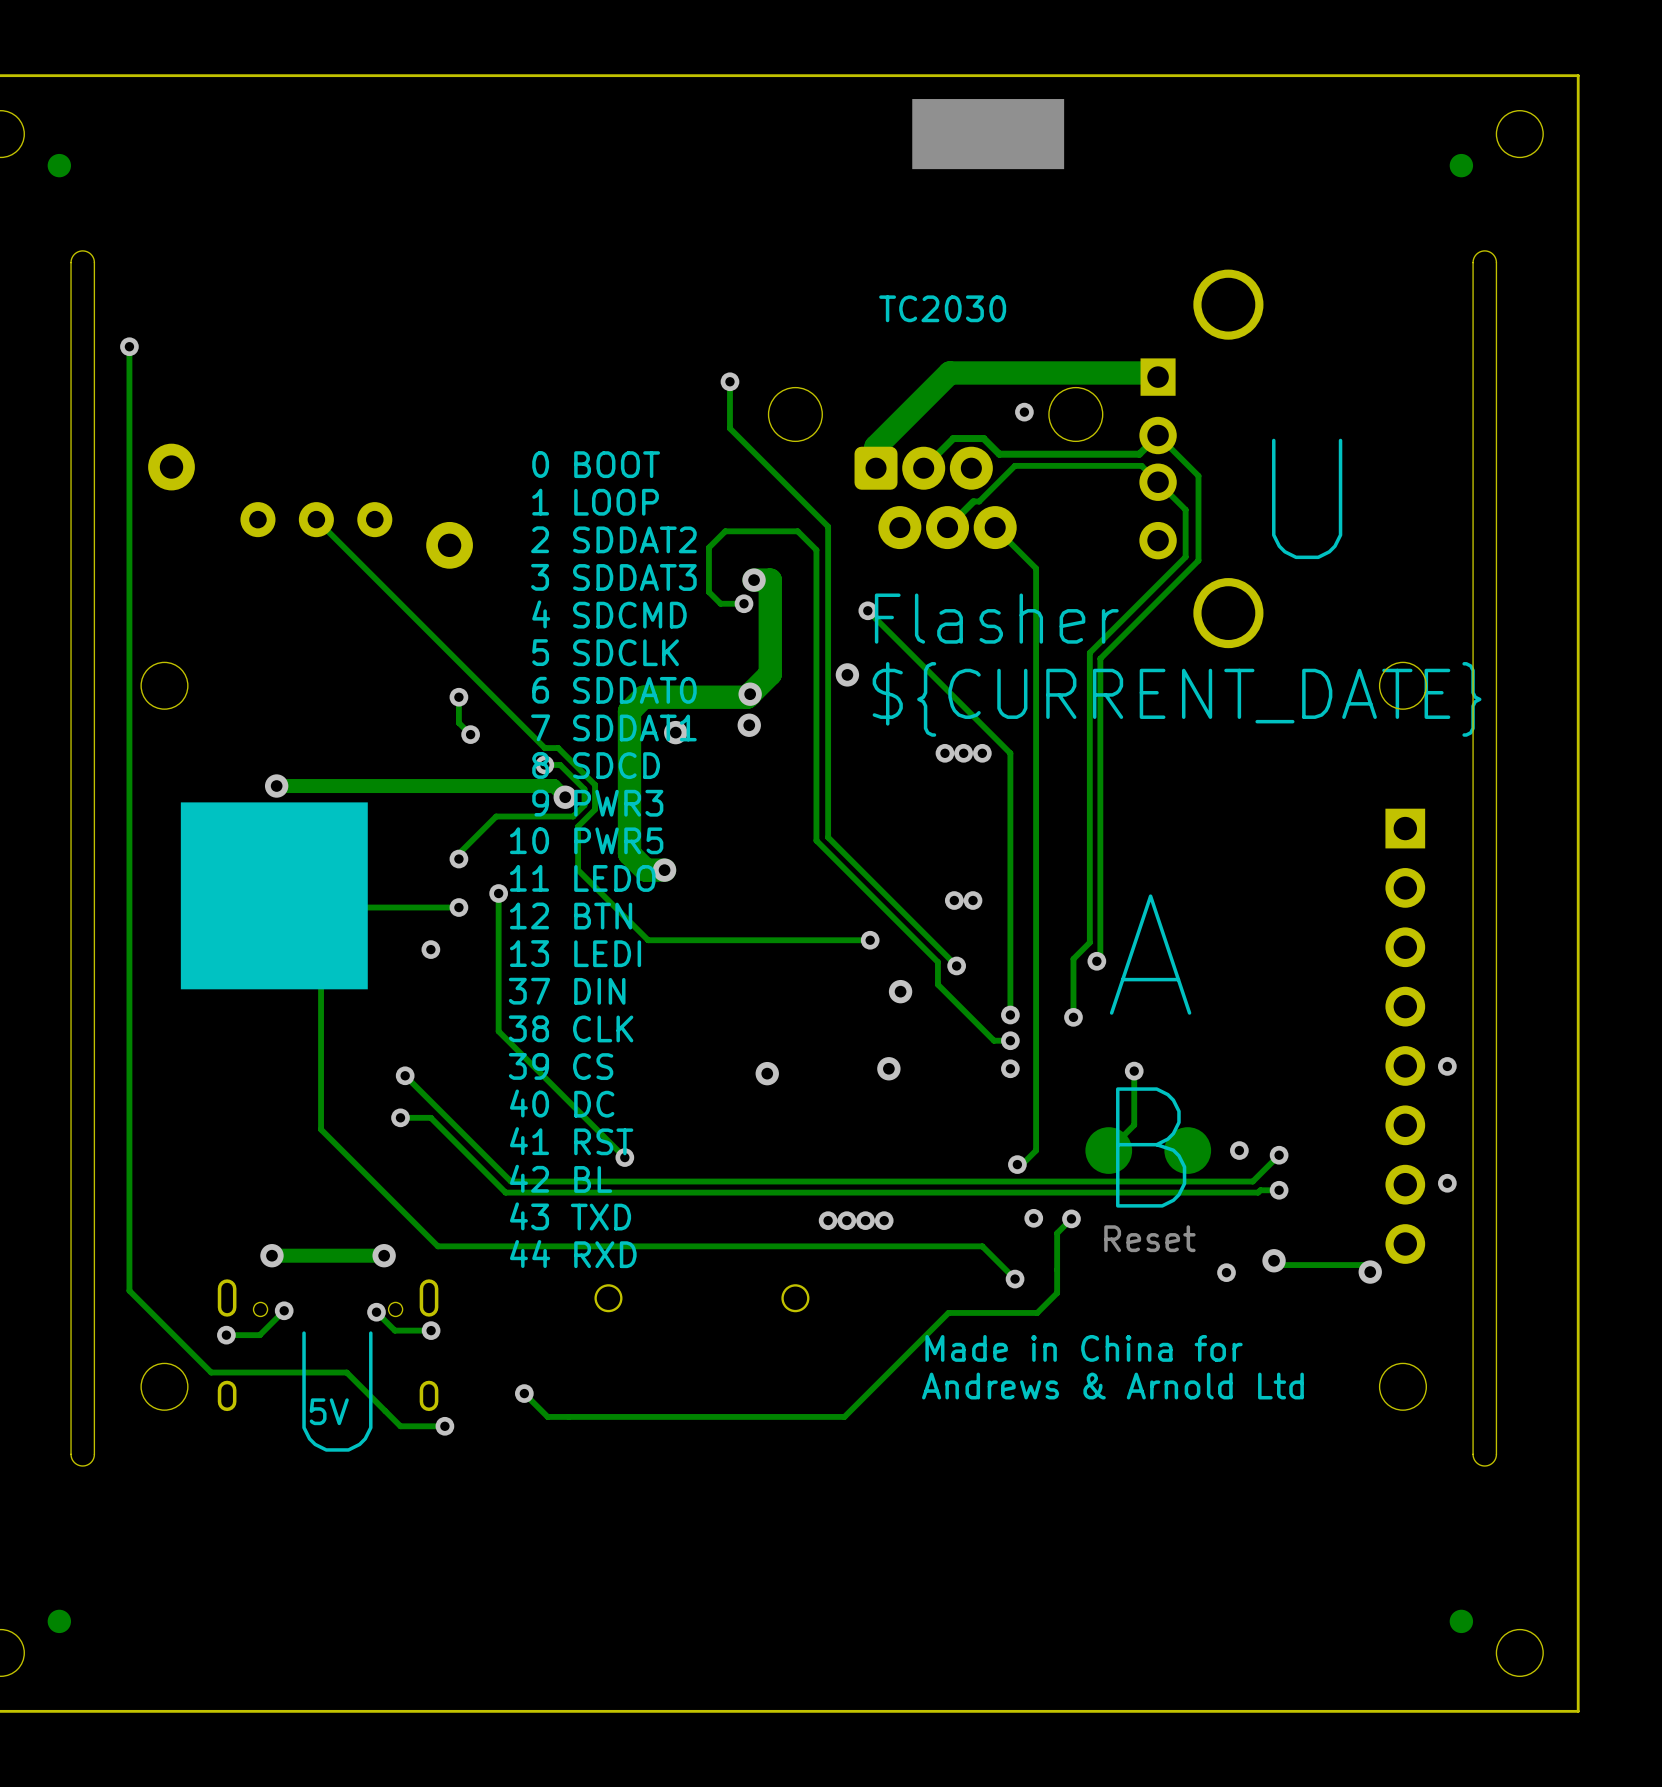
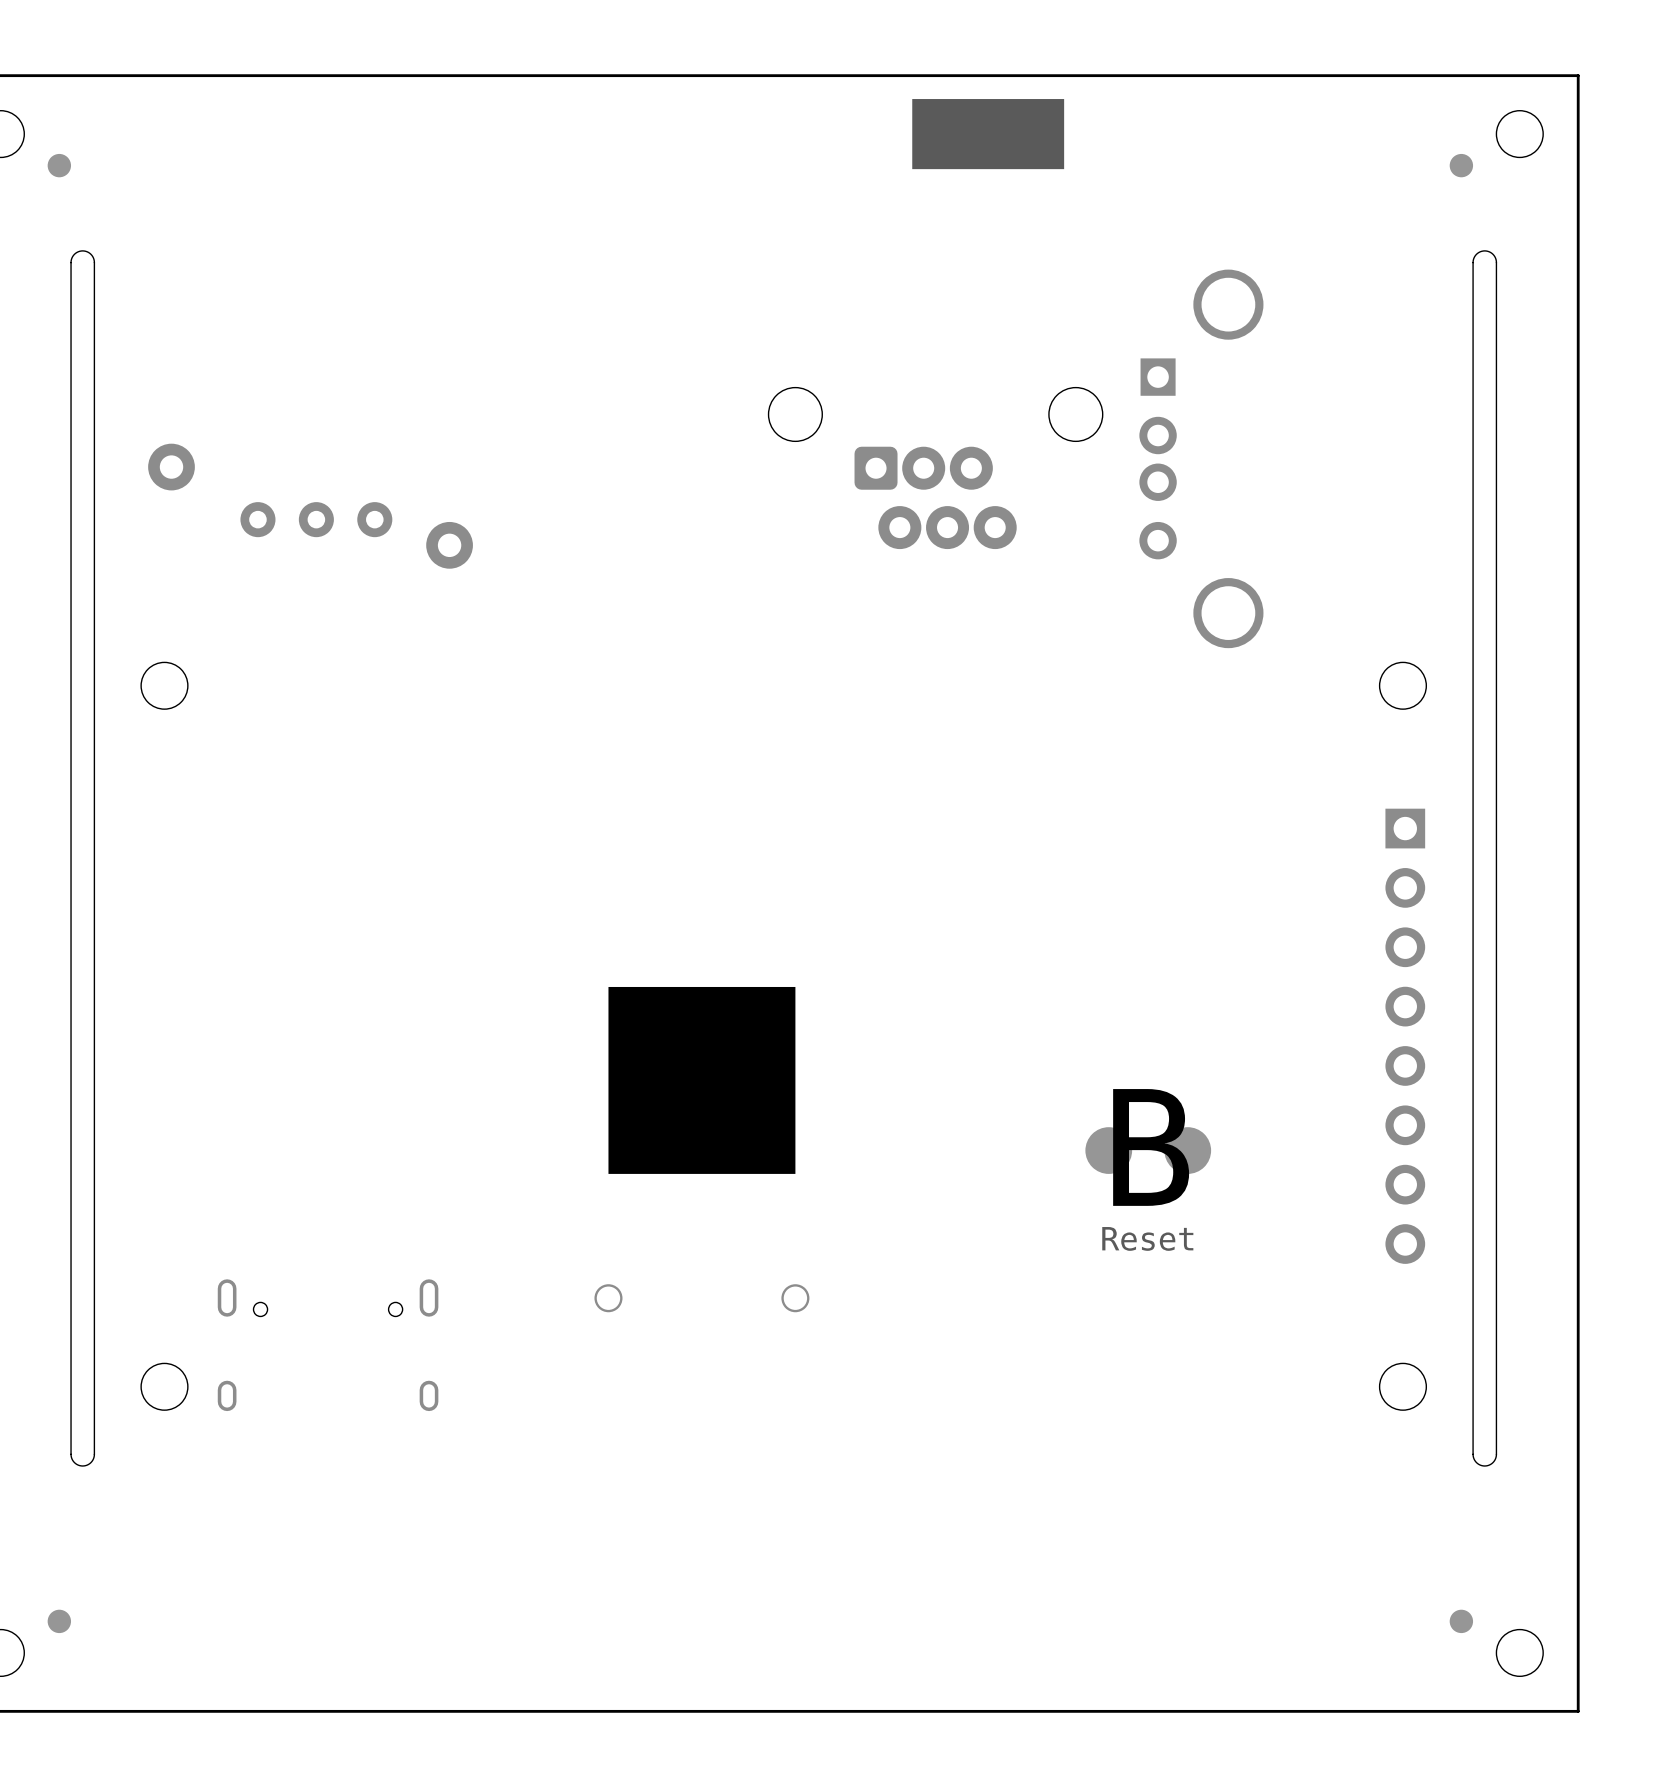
text: TC2030 (942, 308) -> none
track: (129, 346) (129, 1290) (211, 1372) (346, 1372) (400, 1426) (444, 1426) -> none
via: (129, 346) -> none
track: (1153, 372) (949, 372) (876, 446) (876, 468) -> none
track: (729, 381) (729, 428) (828, 526) (828, 837) (956, 965) -> none
via: (729, 381) -> none
via: (1024, 412) -> none
text: 0 (540, 464) -> none
text: BOOT (617, 464) -> none
track: (923, 468) (953, 438) (983, 438) (999, 454) (1139, 454) (1158, 435) (1198, 475) (1198, 560) (1100, 658) (1100, 957) (1096, 961) -> none
text: U (1307, 498) -> none
text: 1 (540, 502) -> none
text: LOOP (616, 502) -> none
track: (316, 519) (544, 748) (558, 748) (595, 784) (595, 809) (578, 826) (578, 870) (648, 940) (870, 940) -> none
track: (947, 527) (973, 501) (979, 501) (1014, 465) (1141, 465) (1185, 509) (1185, 557) (1089, 652) (1089, 942) (1073, 958) (1073, 1017) -> none
track: (995, 527) (1036, 568) (1036, 1150) (1022, 1164) (1017, 1164) -> none
text: 2 (540, 539) -> none
text: SDDAT2 (634, 539) -> none
text: 3 (540, 577) -> none
text: SDDAT3 (634, 577) -> none
track: (754, 580) (770, 580) (770, 674) (747, 697) (643, 697) (629, 711) (629, 853) (645, 870) (664, 870) -> none
via: (754, 580) -> none
track: (744, 603) (720, 603) (708, 592) (708, 547) (725, 531) (797, 531) (816, 550) (816, 840) (937, 962) (937, 984) (994, 1040) (1010, 1040) -> none
via: (744, 603) -> none
track: (867, 610) (1010, 753) (1010, 1015) -> none
via: (867, 610) -> none
text: 4 (541, 614) -> none
text: SDCMD (629, 615) -> none
text: Flasher (996, 618) -> none
text: 5 (540, 652) -> none
text: SDCLK (625, 652) -> none
via: (847, 674) -> none
text: 6 (540, 690) -> none
text: SDDAT0 (634, 690) -> none
via: (750, 694) -> none
track: (458, 697) (458, 722) (470, 734) -> none
via: (458, 697) -> none
text: ${CURRENT_DATE} (1177, 699) -> none
via: (749, 725) -> none
text: 7 (540, 727) -> none
text: SDDAT1 (634, 727) -> none
via: (675, 732) -> none
via: (470, 734) -> none
via: (944, 753) -> none
via: (963, 753) -> none
via: (982, 753) -> none
track: (544, 764) (560, 764) (584, 789) (584, 805) (573, 816) (496, 816) (458, 853) (458, 859) -> none
via: (544, 764) -> none
text: 8 (540, 765) -> none
text: SDCD (616, 765) -> none
track: (276, 786) (554, 786) (565, 797) -> none
via: (276, 786) -> none
via: (565, 797) -> none
text: 9 (540, 803) -> none
text: PWR3 (618, 803) -> none
text: 10 (529, 840) -> none
text: PWR5 (618, 840) -> none
via: (458, 859) -> none
via: (664, 870) -> none
text: 11 (529, 878) -> none
text: LEDO (614, 878) -> none
track: (498, 893) (498, 1031) (624, 1157) -> none
via: (498, 893) -> none
drawing position: (274, 895) -> (701, 1080)
via: (954, 900) -> none
via: (973, 900) -> none
track: (458, 907) (349, 907) (321, 935) (321, 1129) (437, 1246) (982, 1246) (1015, 1279) -> none
via: (458, 907) -> none
text: 12 (529, 915) -> none
text: BTN (603, 916) -> none
via: (870, 940) -> none
via: (430, 949) -> none
text: 13 (529, 953) -> none
text: LEDI (607, 953) -> none
text: A (1150, 954) -> none
via: (1096, 961) -> none
via: (956, 965) -> none
text: 37 (529, 991) -> none
text: DIN (599, 991) -> none
via: (900, 991) -> none
via: (1010, 1015) -> none
via: (1073, 1017) -> none
text: 38 (528, 1028) -> none
text: CLK (603, 1028) -> none
via: (1010, 1040) -> none
text: 39 (528, 1066) -> none
text: CS (593, 1066) -> none
via: (1447, 1066) -> none
via: (888, 1068) -> none
via: (1010, 1068) -> none
track: (1134, 1071) (1134, 1125) (1108, 1150) -> none
via: (1134, 1071) -> none
via: (767, 1073) -> none
track: (405, 1075) (510, 1181) (1252, 1181) (1279, 1155) -> none
via: (405, 1075) -> none
text: 40 (529, 1103) -> none
text: DC (594, 1104) -> none
track: (400, 1117) (430, 1117) (505, 1192) (1258, 1192) (1260, 1190) (1279, 1190) -> none
via: (400, 1117) -> none
text: 41 (529, 1141) -> none
text: RST (603, 1141) -> none
via: (1239, 1150) -> none
via: (1279, 1155) -> none
via: (624, 1157) -> none
via: (1017, 1164) -> none
text: 42 (529, 1178) -> none
text: BL (593, 1179) -> none
via: (1447, 1183) -> none
via: (1279, 1190) -> none
text: 43 (529, 1216) -> none
text: TXD (600, 1217) -> none
via: (1033, 1218) -> none
track: (1071, 1218) (1057, 1233) (1057, 1293) (1037, 1312) (948, 1312) (844, 1416) (547, 1416) (524, 1393) -> none
via: (1071, 1218) -> none
via: (828, 1220) -> none
via: (846, 1220) -> none
via: (865, 1220) -> none
via: (884, 1220) -> none
text: 44 (530, 1253) -> none
text: RXD (605, 1254) -> none
via: (271, 1255) -> none
track: (384, 1255) (271, 1255) -> none
via: (384, 1255) -> none
track: (1274, 1260) (1278, 1265) (1363, 1265) (1370, 1272) -> none
via: (1274, 1260) -> none
via: (1226, 1272) -> none
via: (1370, 1272) -> none
via: (1015, 1279) -> none
track: (284, 1310) (259, 1335) (226, 1335) -> none
via: (284, 1310) -> none
track: (376, 1312) (394, 1330) (431, 1330) -> none
via: (376, 1312) -> none
via: (431, 1330) -> none
via: (226, 1335) -> none
text: Made in China for (1084, 1348) -> none
text: Andrews & Arnold Ltd (1112, 1386) -> none
text: U (337, 1391) -> none
via: (524, 1393) -> none
text: 5V (329, 1411) -> none
via: (444, 1426) -> none

